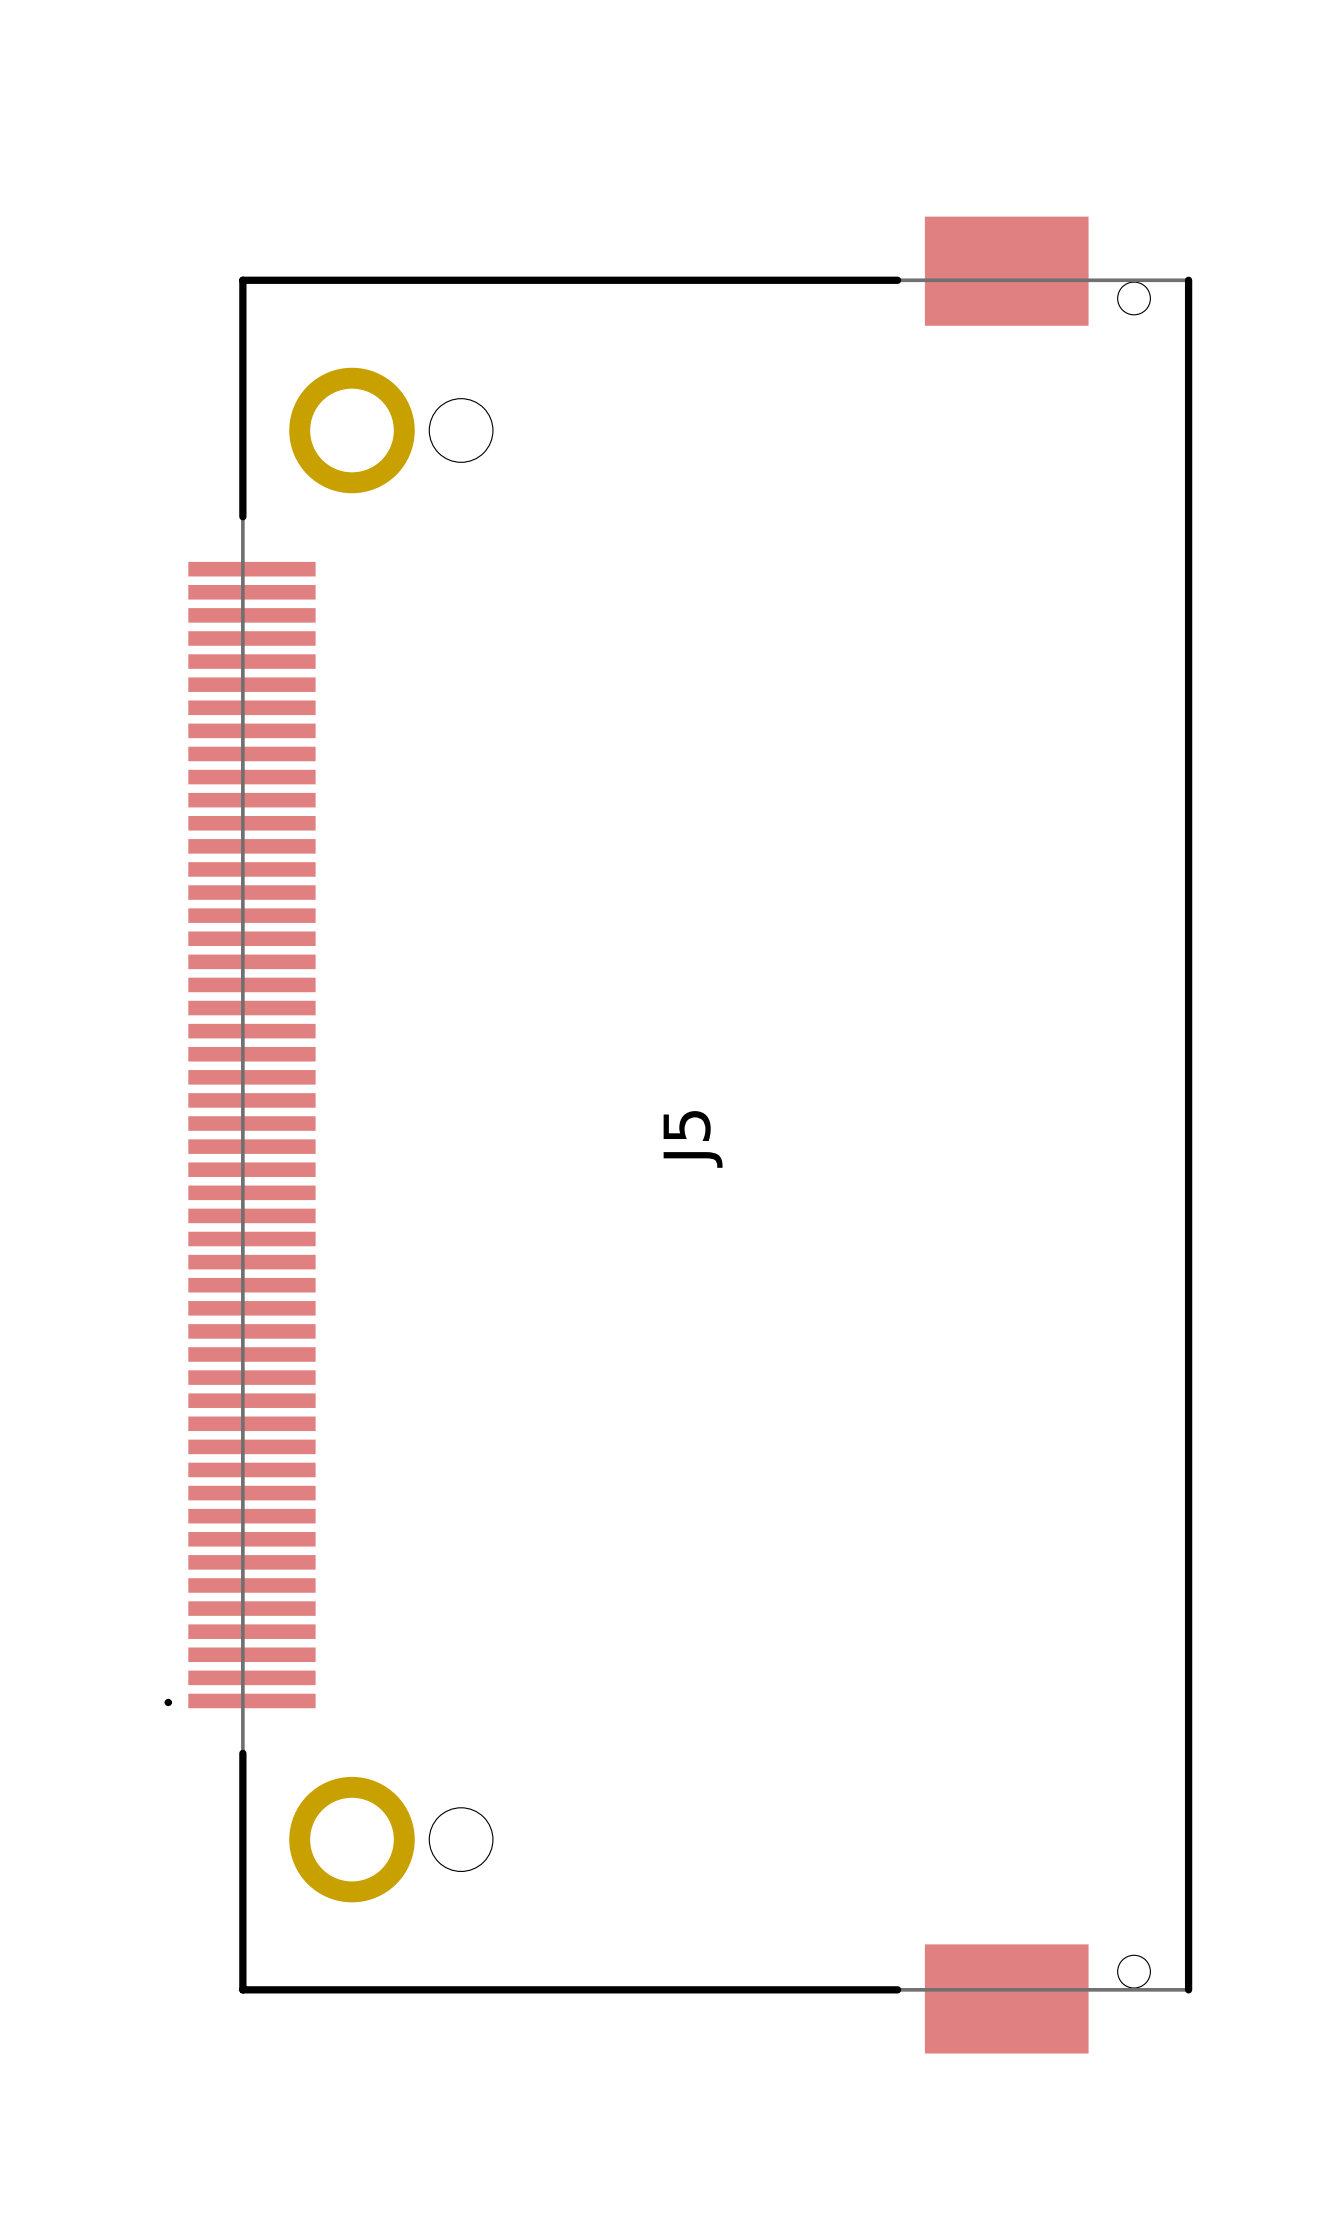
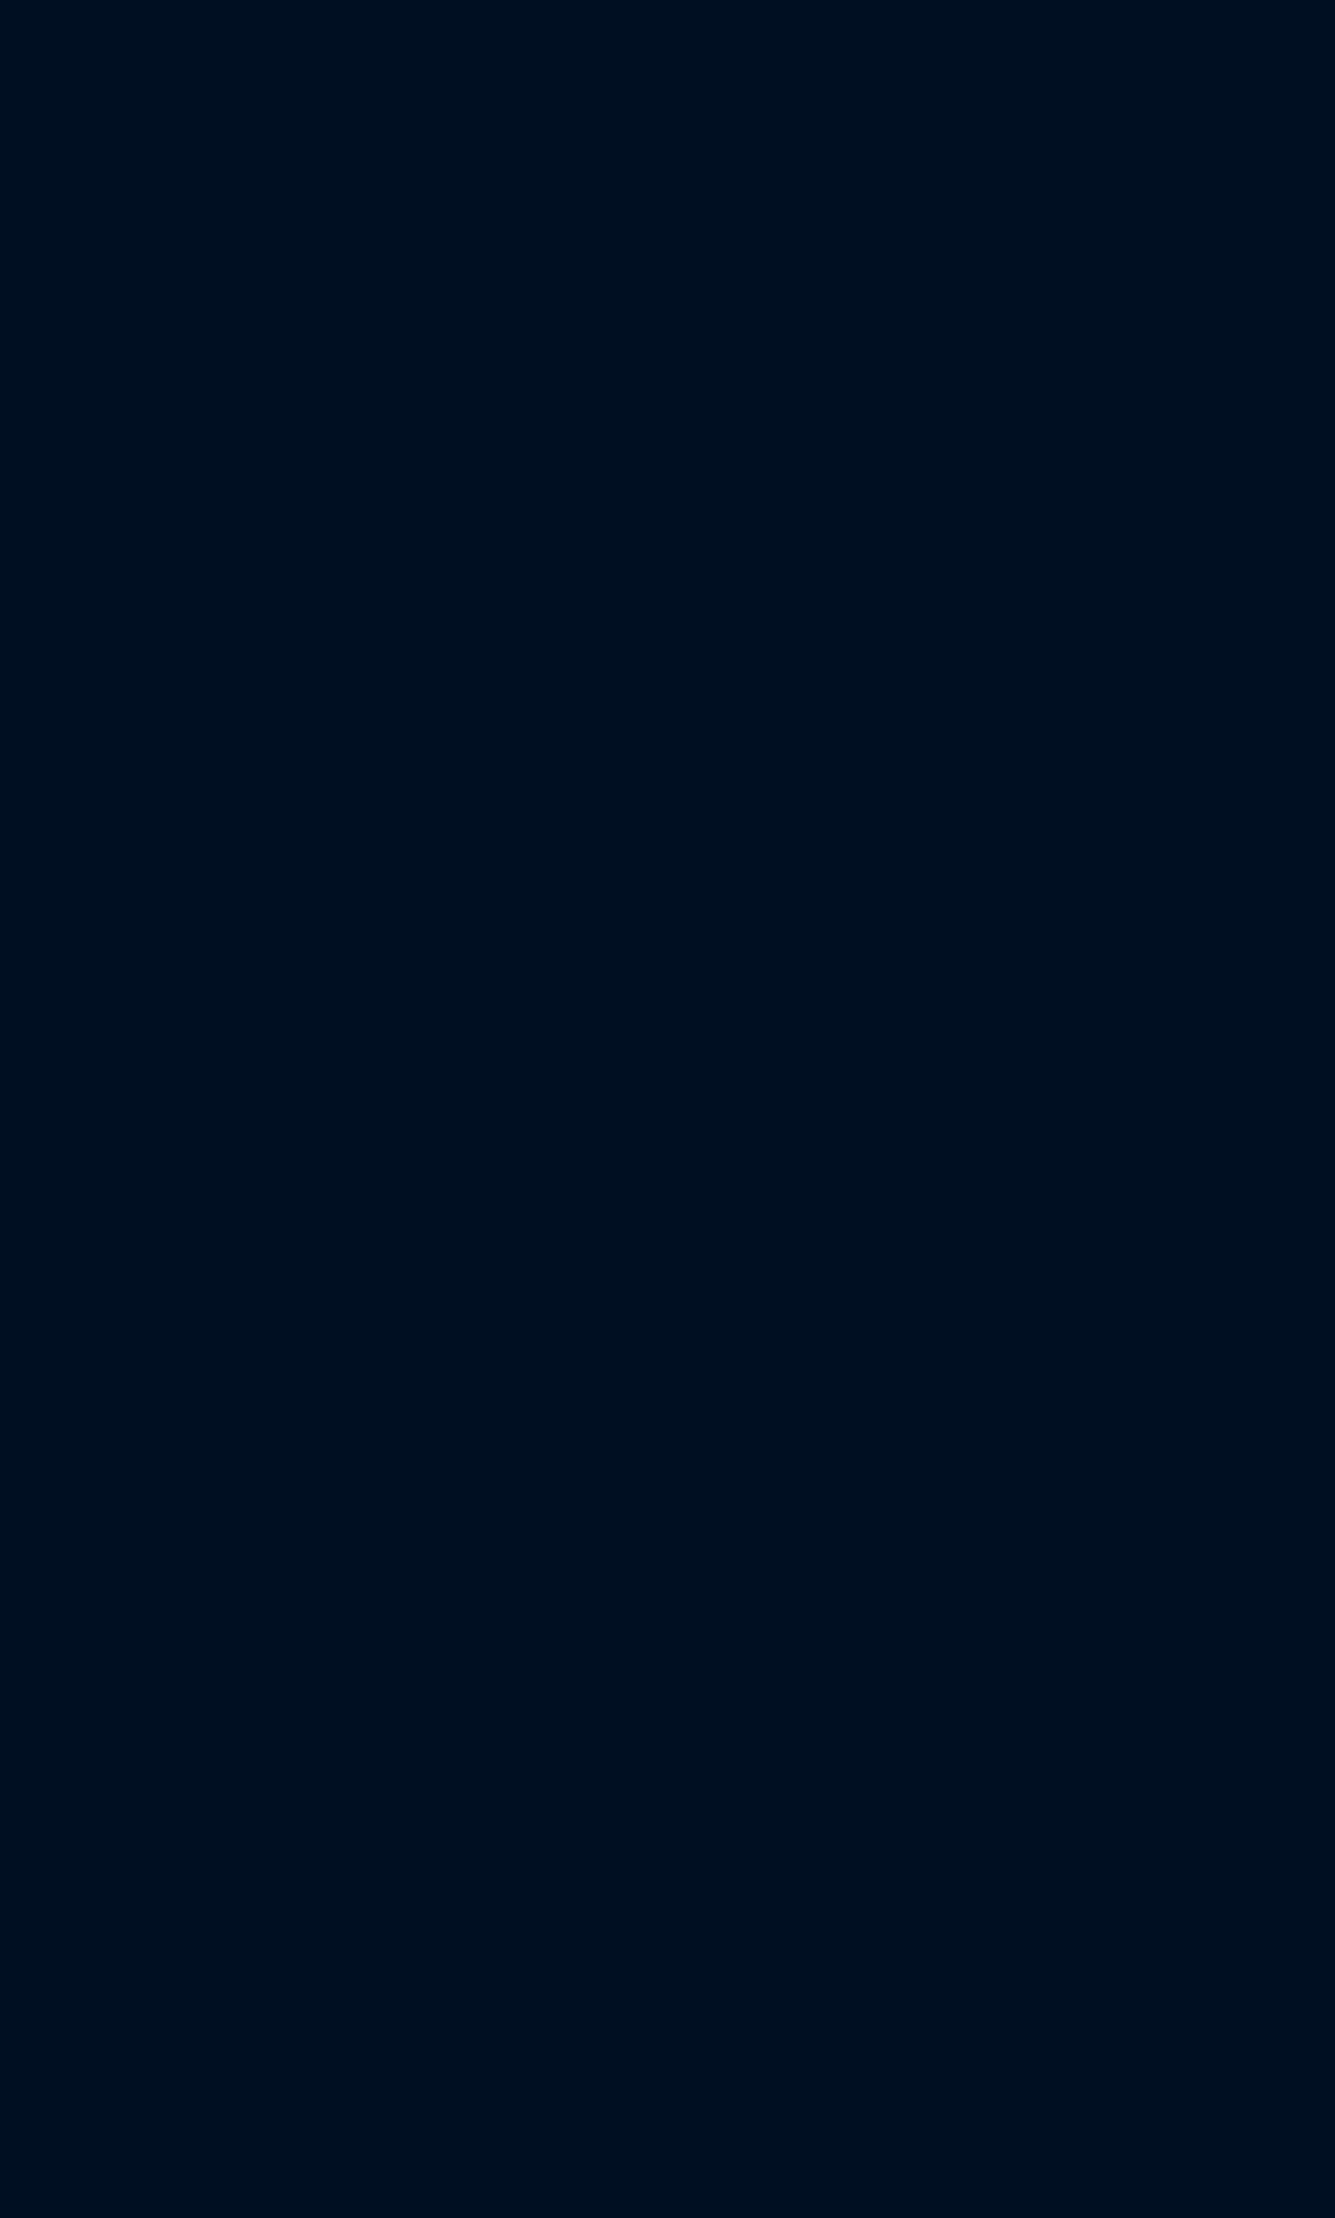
J5: (678, 1135) -> none

